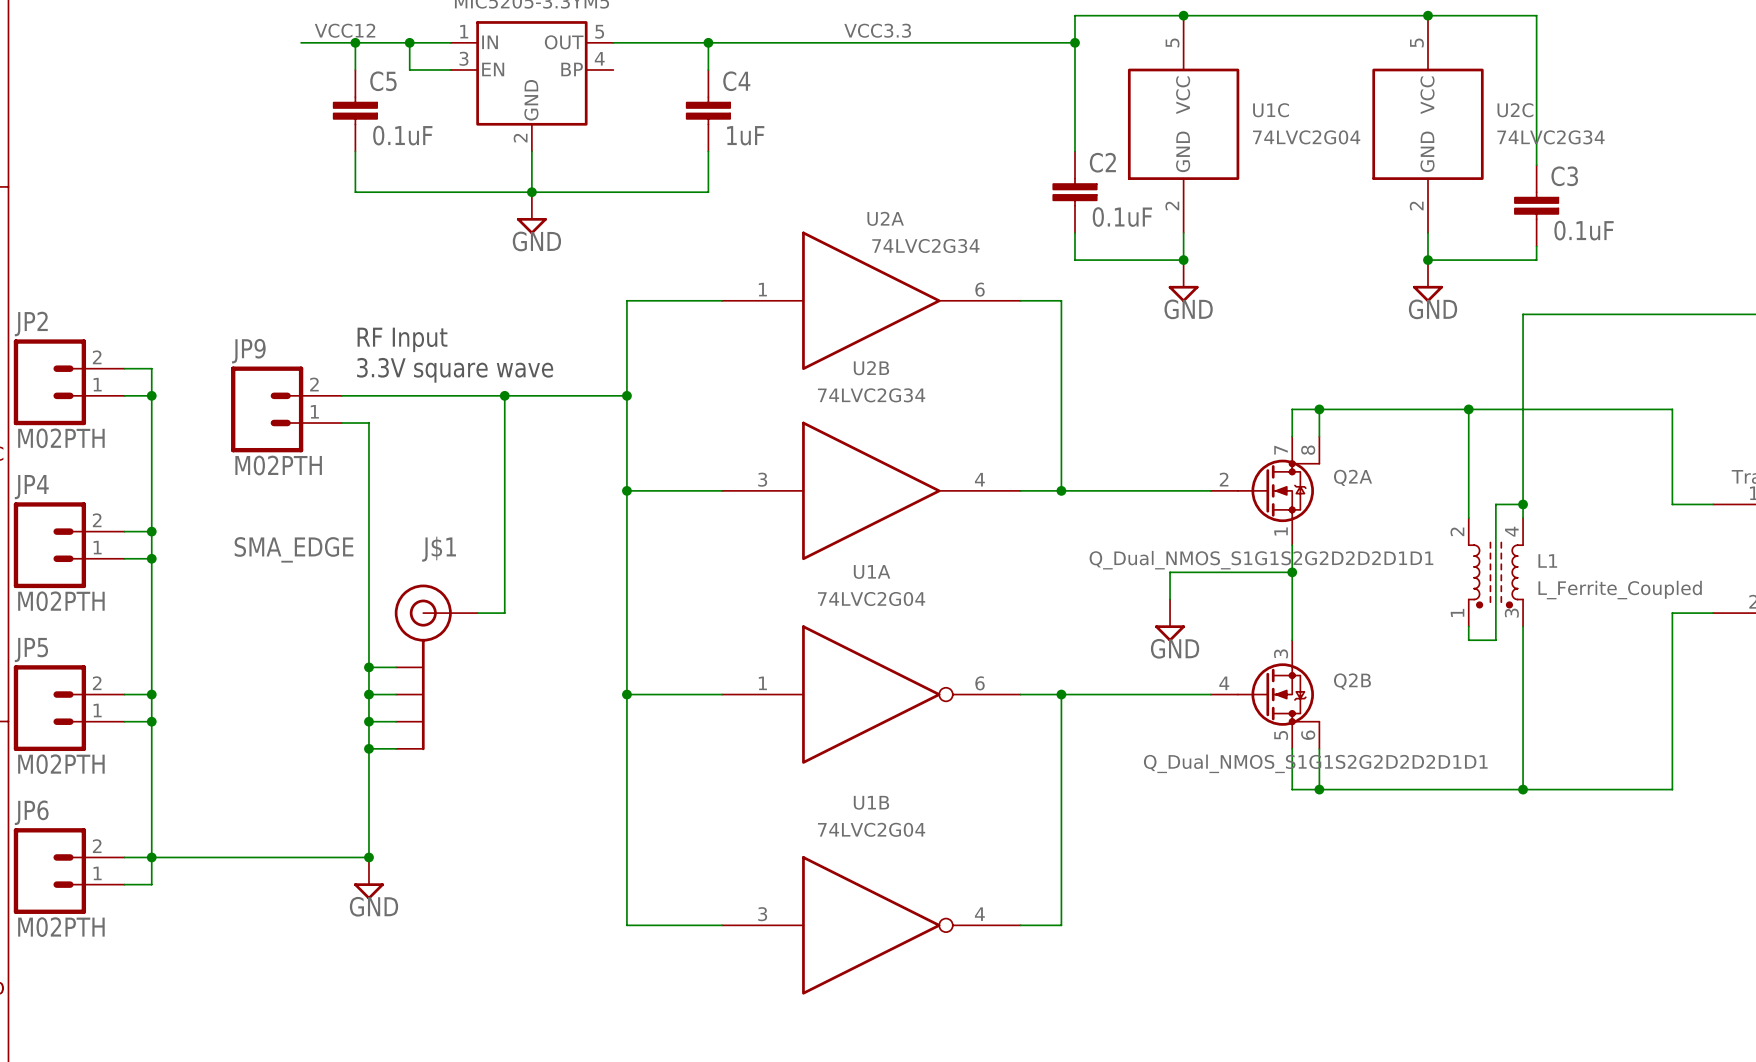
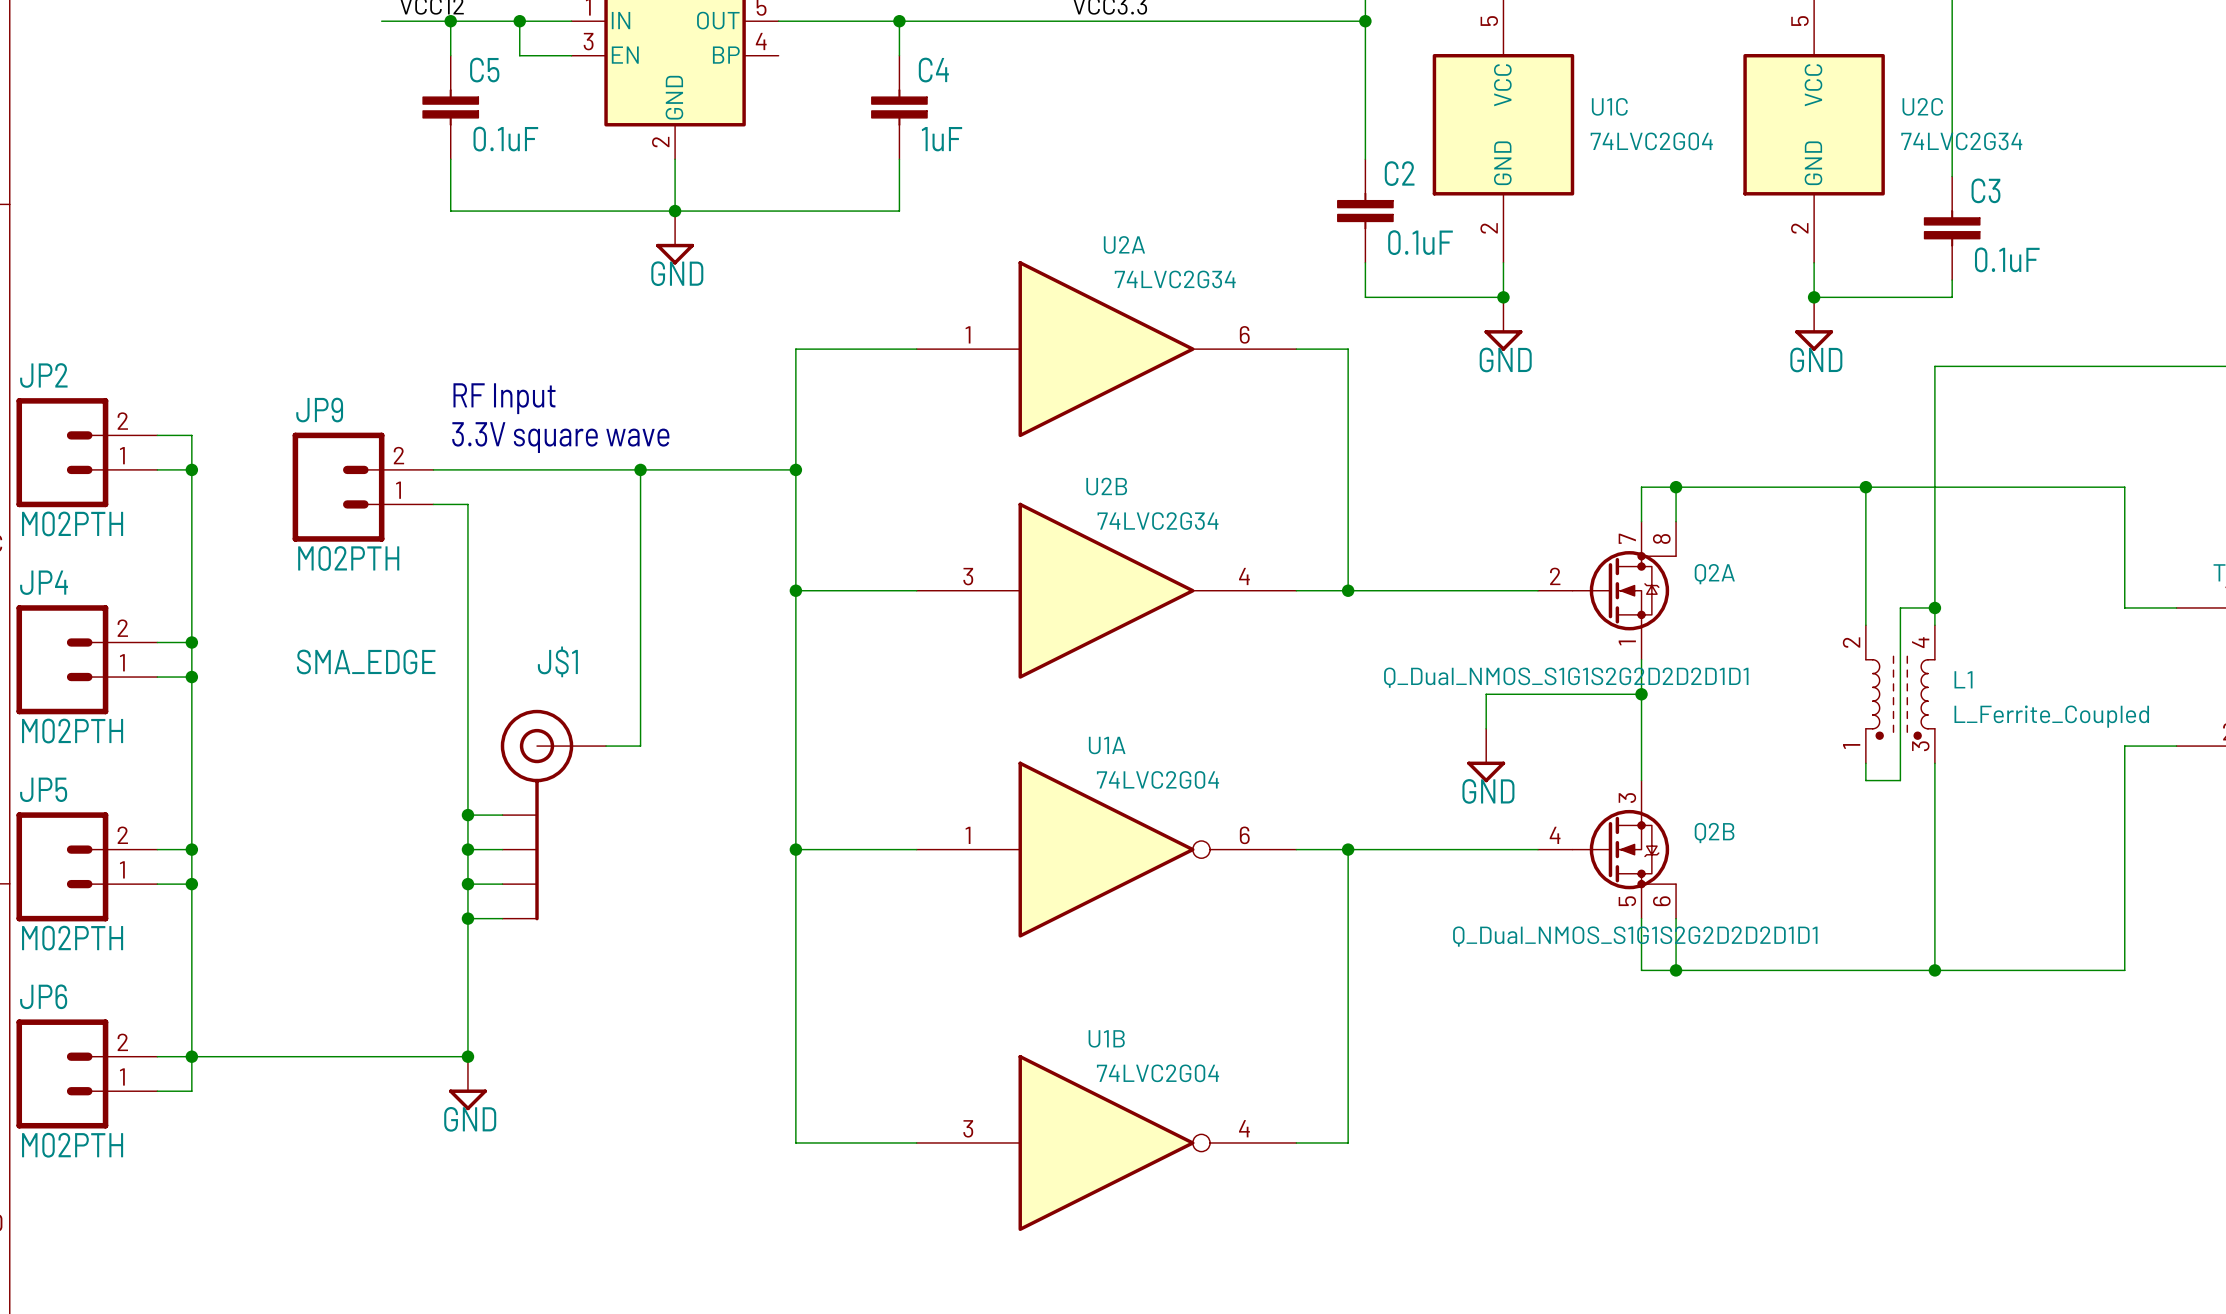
U2B name position: U2B (871, 368) -> U2B (1106, 486)
U2B value position: 74LVC2G34 (871, 395) -> 74LVC2G34 (1157, 521)
U1A name position: U1A (872, 571) -> U1A (1107, 745)
U1A value position: 74LVC2G04 (871, 599) -> 74LVC2G04 (1157, 779)
U1B name position: U1B (871, 802) -> U1B (1106, 1038)
U1B value position: 74LVC2G04 (871, 829) -> 74LVC2G04 (1157, 1073)

